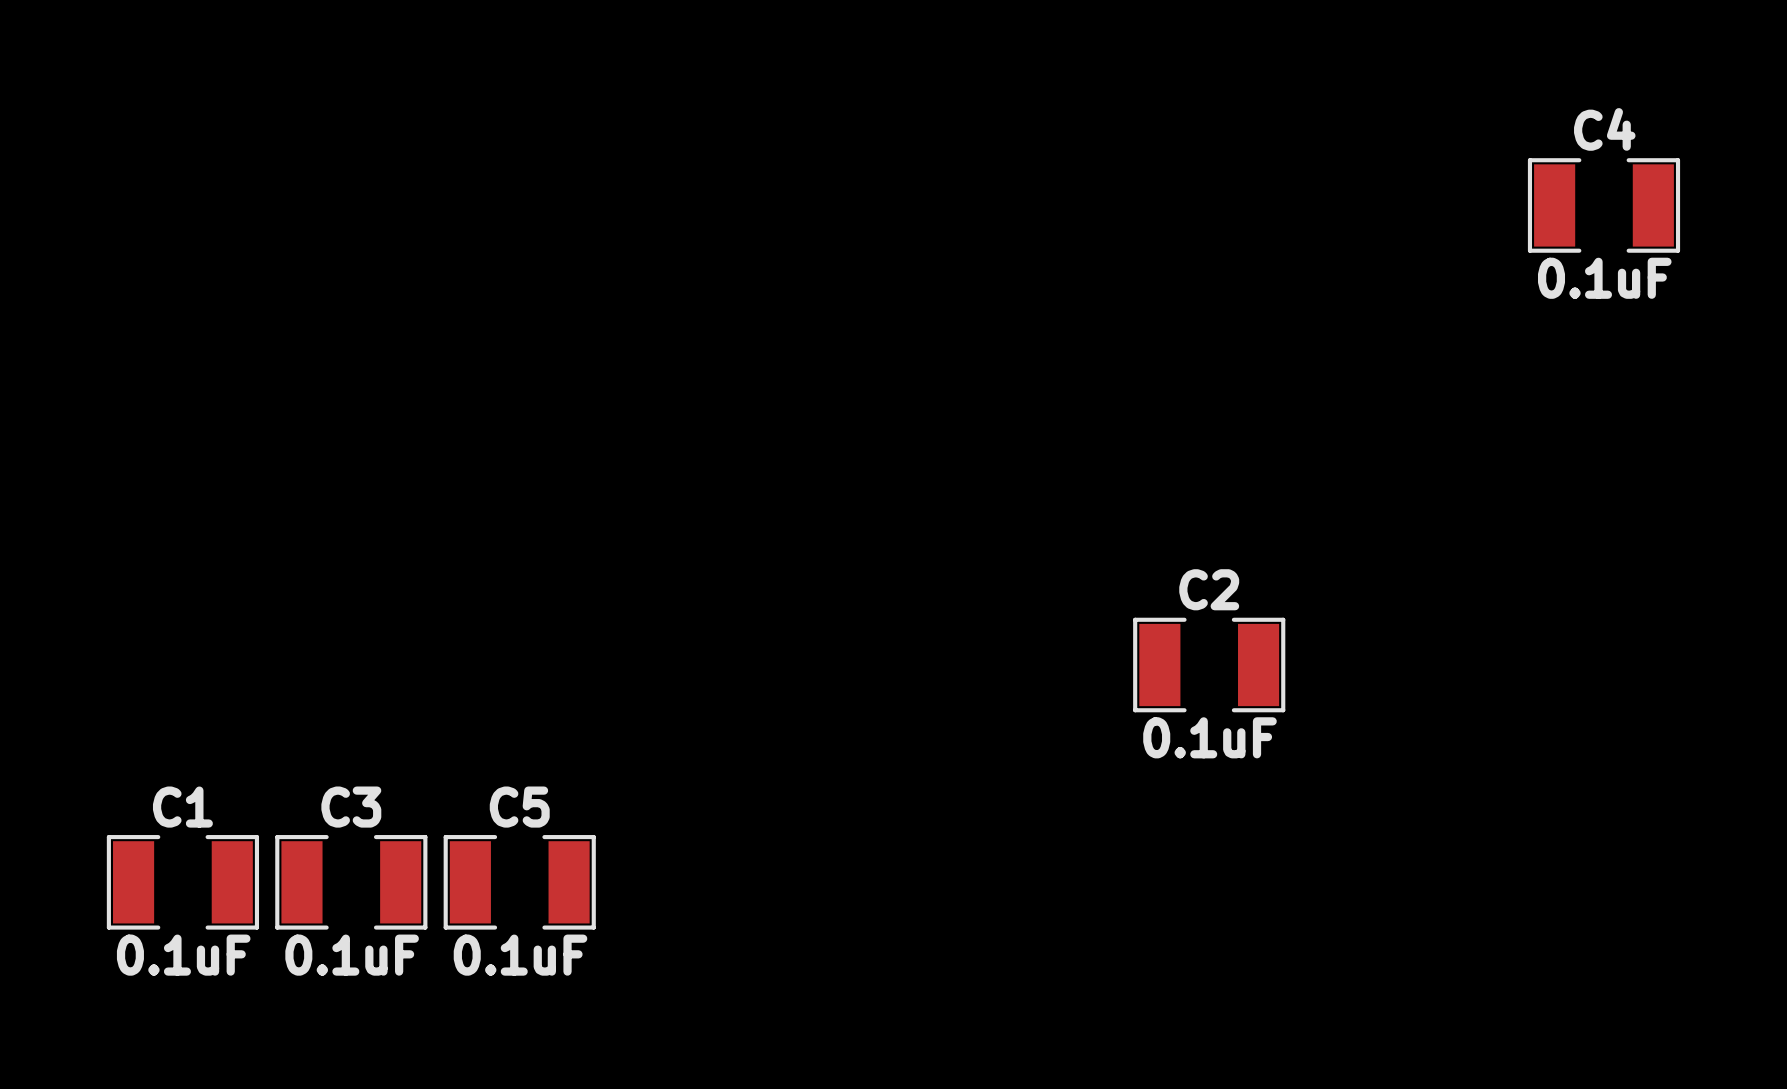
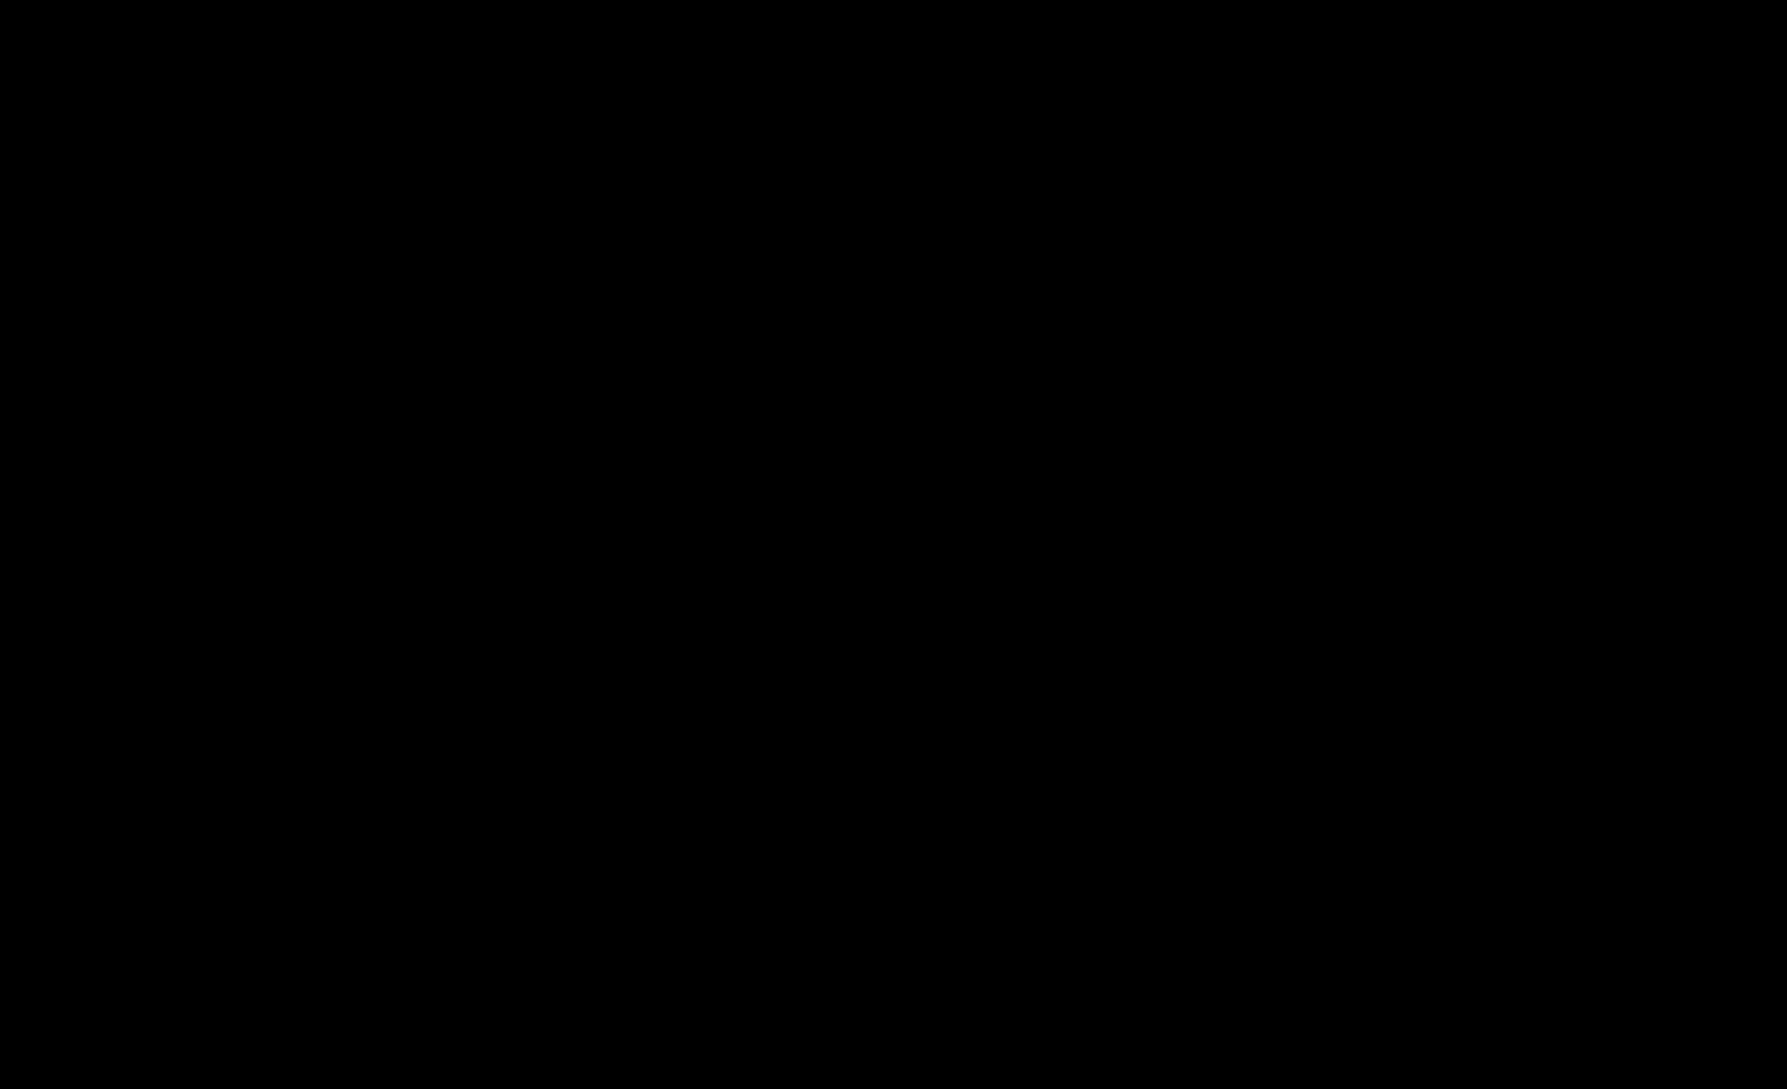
C4: 0.1uF (1603, 205) -> none
C2: 0.1uF (1209, 665) -> none
C1: 0.1uF (182, 882) -> none
C3: 0.1uF (351, 882) -> none
C5: 0.1uF (519, 882) -> none

